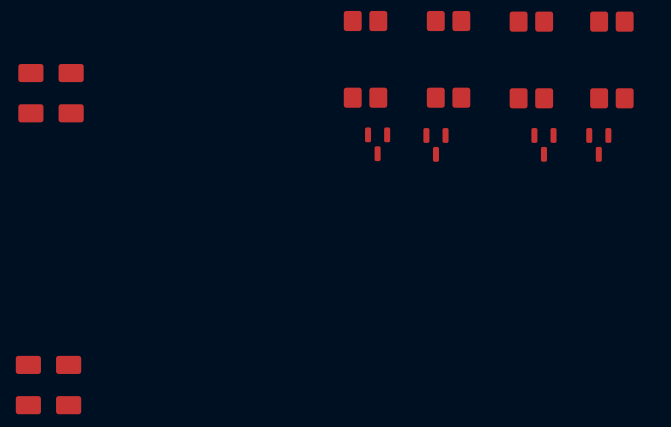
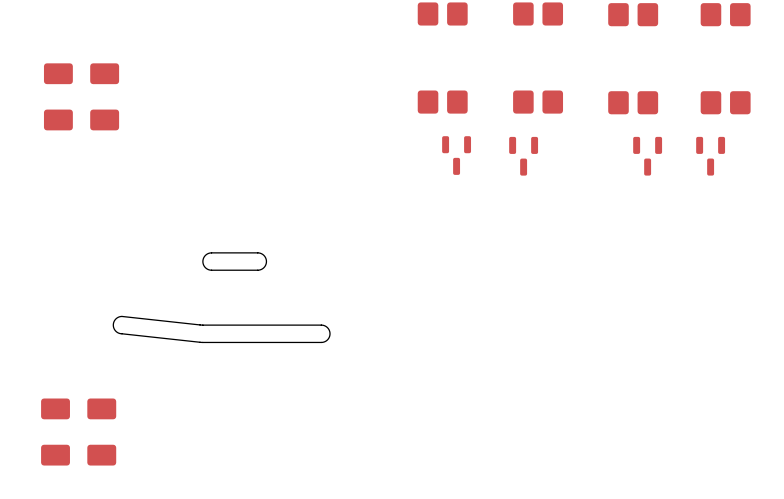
board edge: none -> (257, 252) (210, 252) (204, 256) (202, 262) (205, 267) (210, 270) (258, 270) (264, 266) (266, 260) (263, 254) (257, 252)
board edge: none -> (121, 316) (201, 325) (322, 325) (328, 328) (329, 334) (327, 339) (321, 342) (201, 342) (118, 333) (114, 330) (113, 324) (116, 318) (121, 316)

